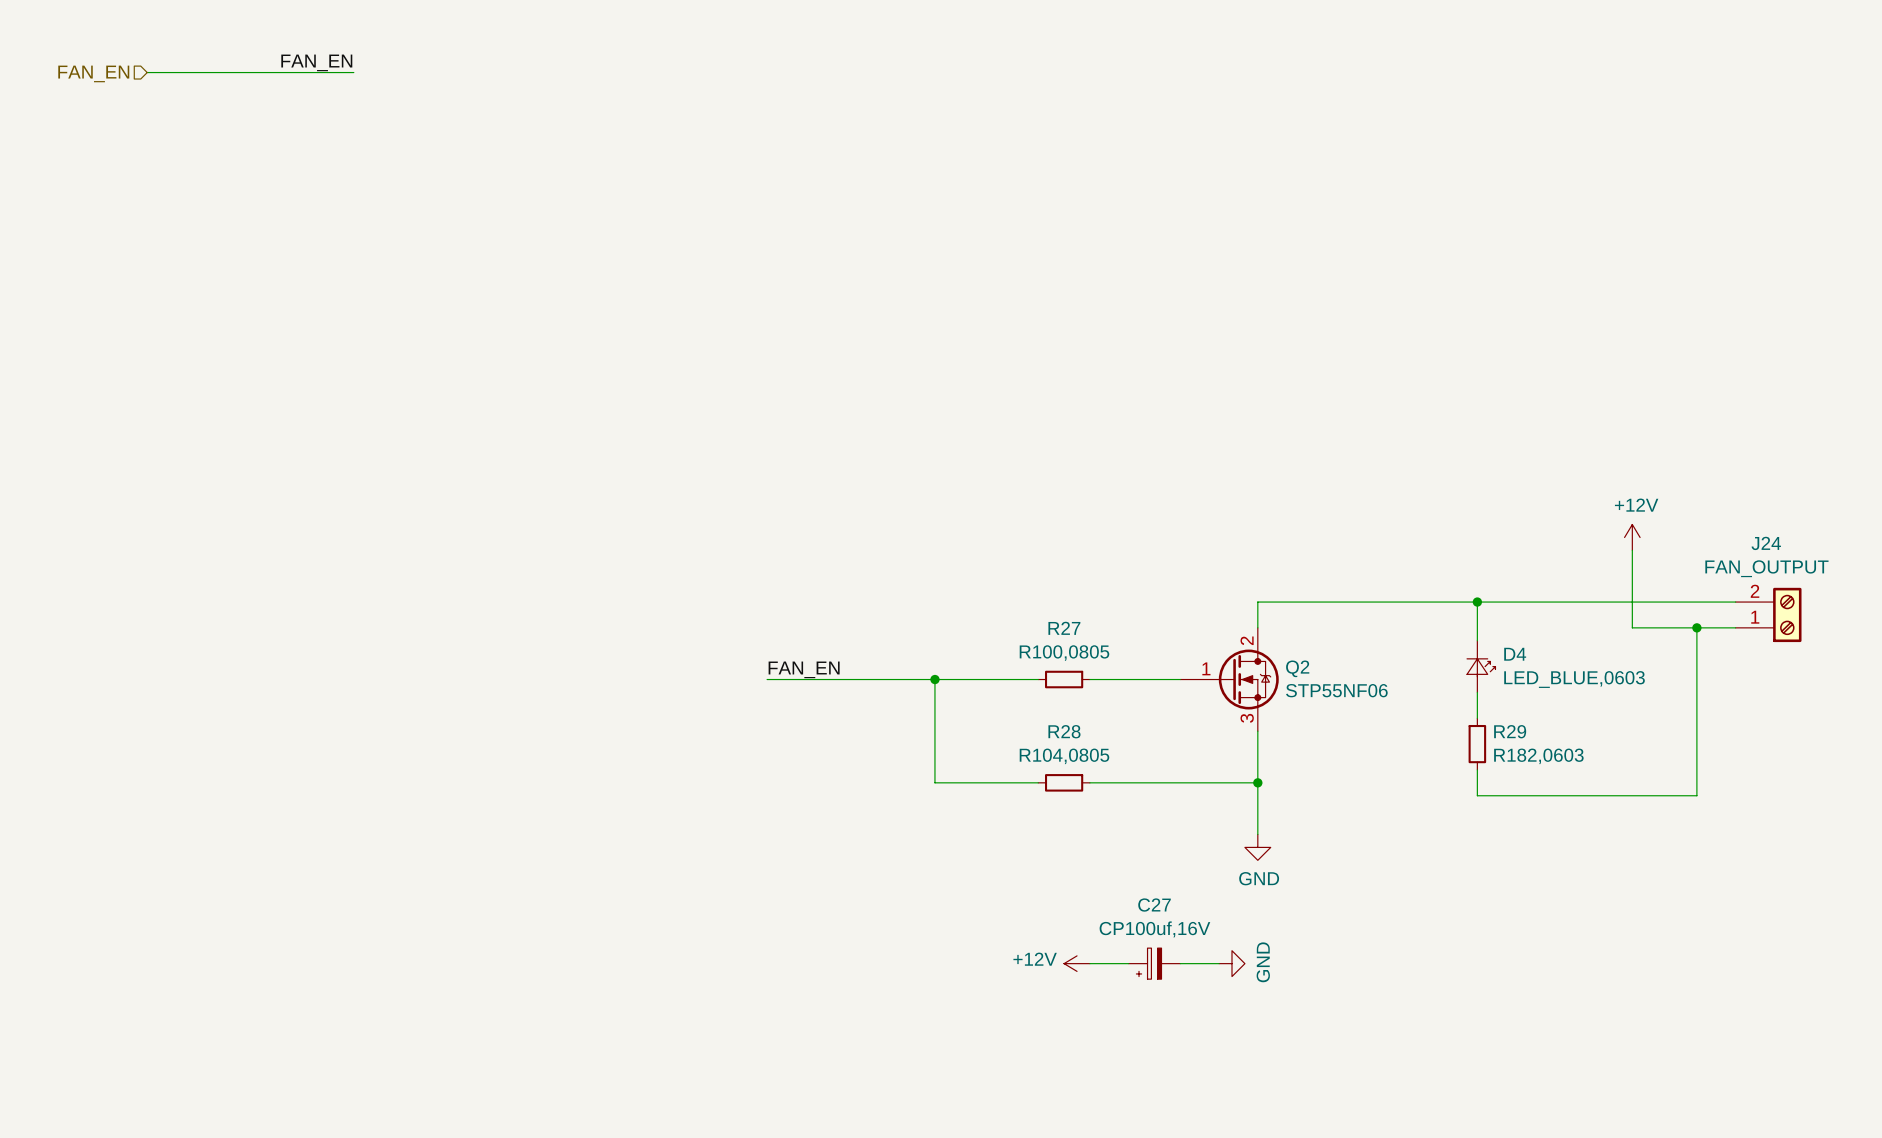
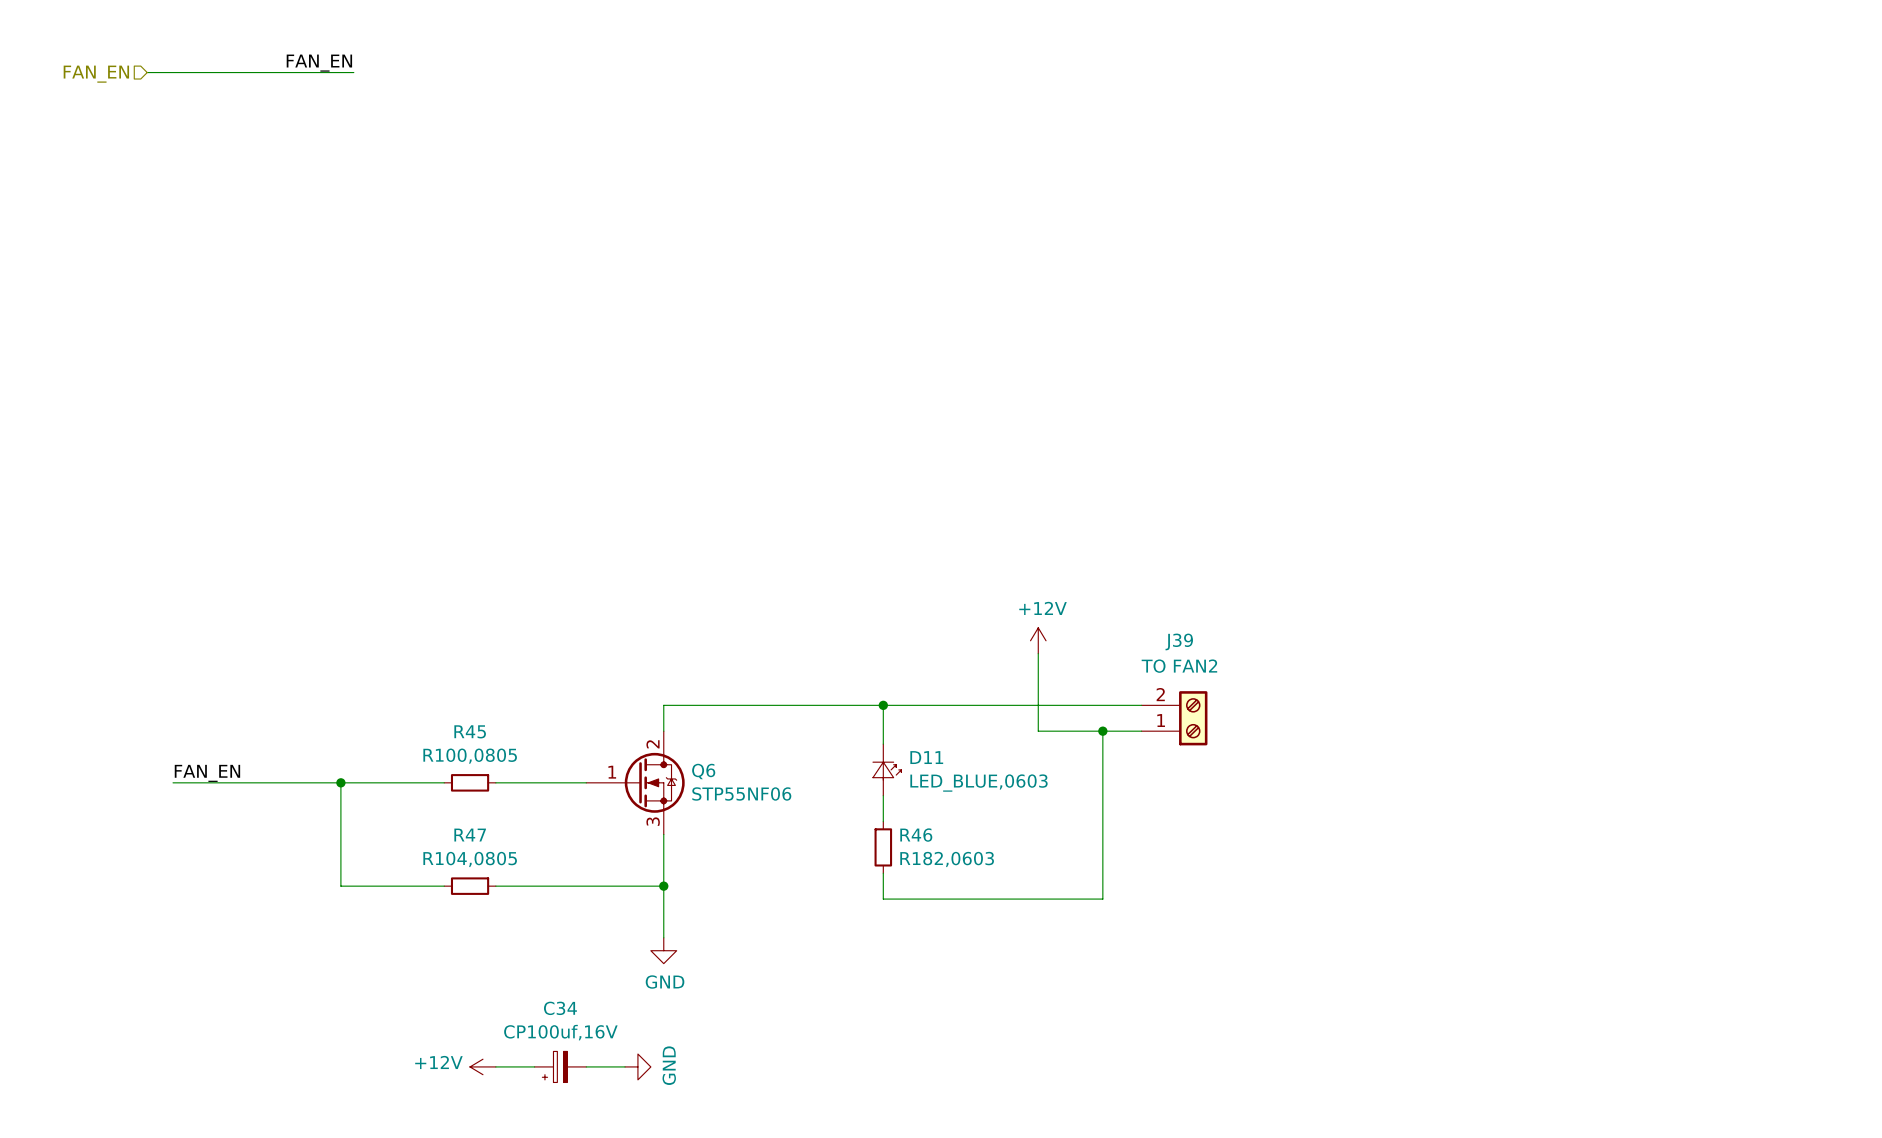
power symbol: +12V (1632, 537) -> none
wire: (1632, 550) (1632, 627) (1735, 627) -> none
wire: (1477, 602) (1477, 640) -> none
junction: (1477, 602) -> none
wire: (1735, 602) (1257, 602) (1257, 627) -> none
J24: FAN_OUTPUT (1768, 614) -> none
wire: (1696, 627) (1696, 795) (1477, 795) (1477, 769) -> none
junction: (1696, 627) -> none
power symbol: none -> +12V (1038, 640)
wire: none -> (1038, 653) (1038, 731) (1141, 731)
D4: LED_BLUE,0603 (1481, 666) -> none
label: FAN_EN (804, 669) -> none
wire: (767, 679) (1038, 679) -> none
wire: (934, 679) (934, 782) (1038, 782) -> none
junction position: (934, 679) -> (883, 705)
R27: R100,0805 (1064, 679) -> none
wire: (1089, 679) (1180, 679) -> none
Q2: STP55NF06 (1229, 679) -> none
wire: (1477, 692) (1477, 718) -> none
wire: none -> (883, 705) (883, 744)
wire: none -> (1141, 705) (663, 705) (663, 731)
J39: none -> TO FAN2 (1174, 718)
wire: none -> (1102, 731) (1102, 899) (883, 899) (883, 873)
junction: none -> (1102, 731)
wire: (1257, 731) (1257, 834) -> none
R29: R182,0603 (1477, 744) -> none
D11: none -> LED_BLUE,0603 (887, 769)
label: none -> FAN_EN (207, 773)
wire: none -> (173, 782) (444, 782)
wire: none -> (340, 782) (340, 886) (444, 886)
junction: none -> (340, 782)
R45: none -> R100,0805 (470, 782)
wire: none -> (495, 782) (586, 782)
Q6: none -> STP55NF06 (635, 782)
R28: R104,0805 (1064, 782) -> none
wire: (1089, 782) (1257, 782) -> none
junction: (1257, 782) -> none
wire: none -> (883, 795) (883, 821)
wire: none -> (663, 834) (663, 937)
R46: none -> R182,0603 (883, 847)
power symbol: GND (1257, 847) -> none
R47: none -> R104,0805 (470, 886)
wire: none -> (495, 886) (663, 886)
junction: none -> (663, 886)
power symbol: none -> GND (663, 950)
power symbol: +12V (1077, 963) -> none
wire: (1089, 963) (1128, 963) -> none
C27: CP100uf,16V (1154, 963) -> none
wire: (1180, 963) (1219, 963) -> none
power symbol: GND (1231, 963) -> none
power symbol: none -> +12V (482, 1066)
wire: none -> (495, 1066) (534, 1066)
C34: none -> CP100uf,16V (560, 1066)
wire: none -> (586, 1066) (625, 1066)
power symbol: none -> GND (637, 1066)

